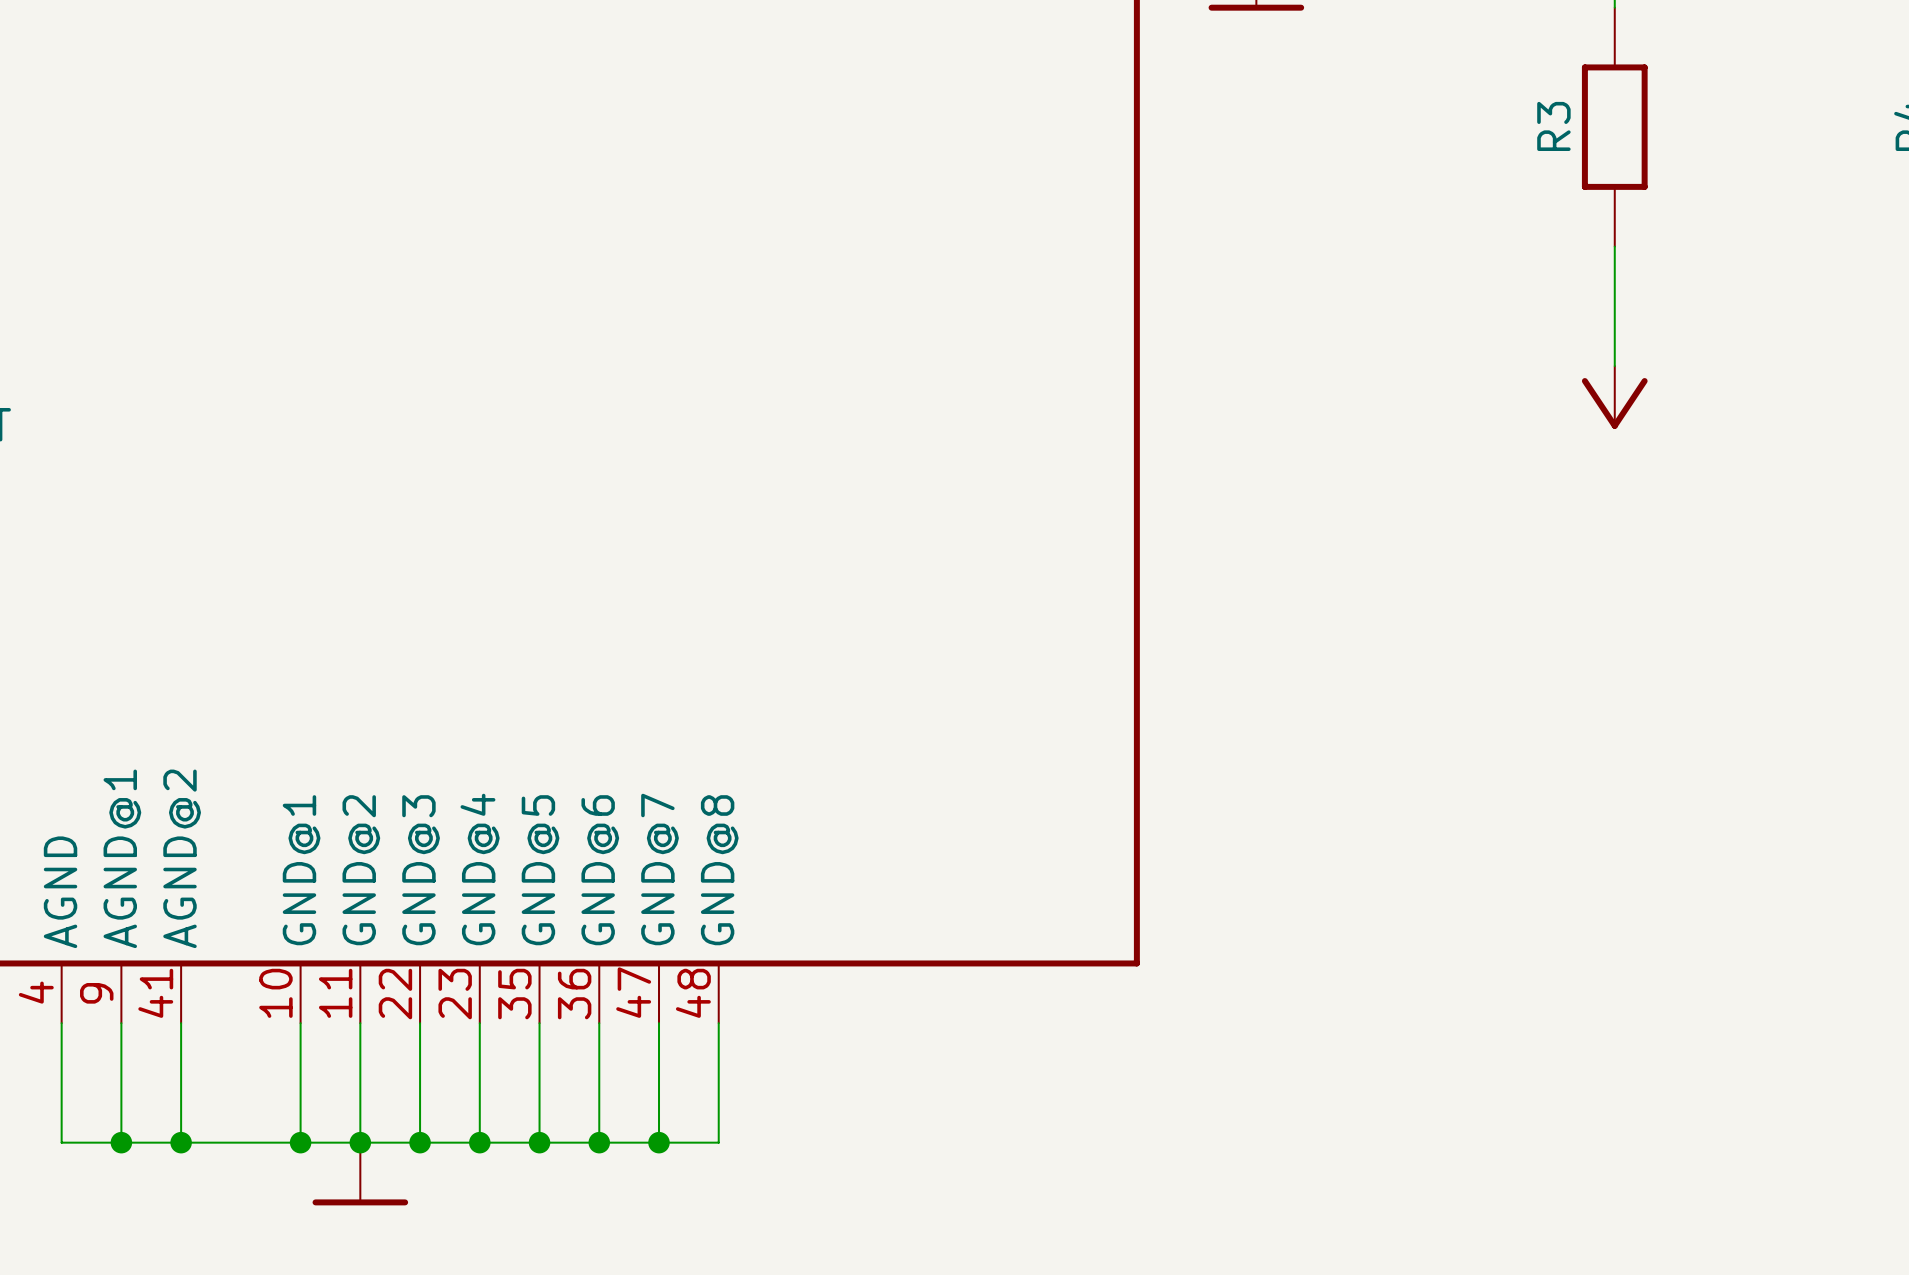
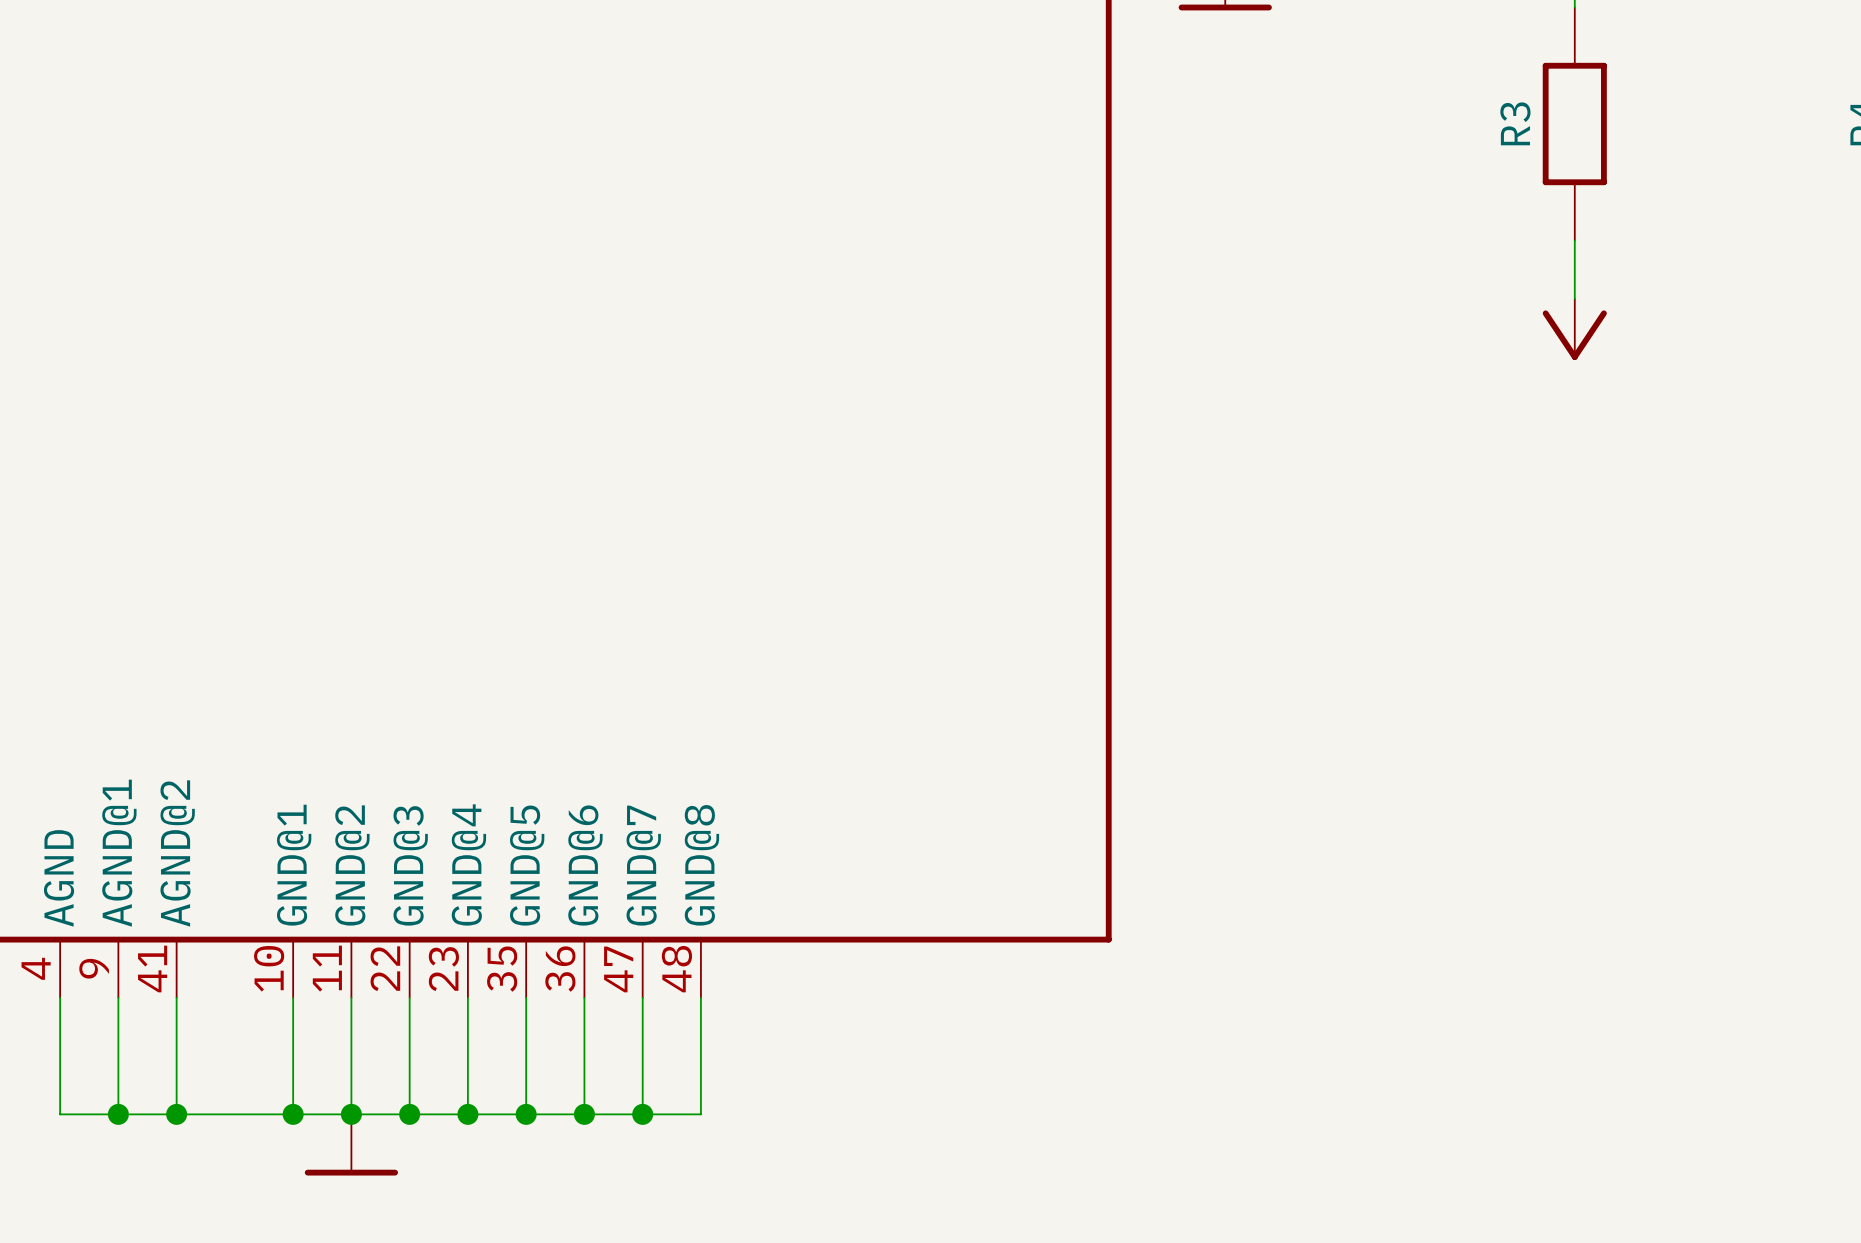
power symbol position: (1614, 397) -> (1574, 329)

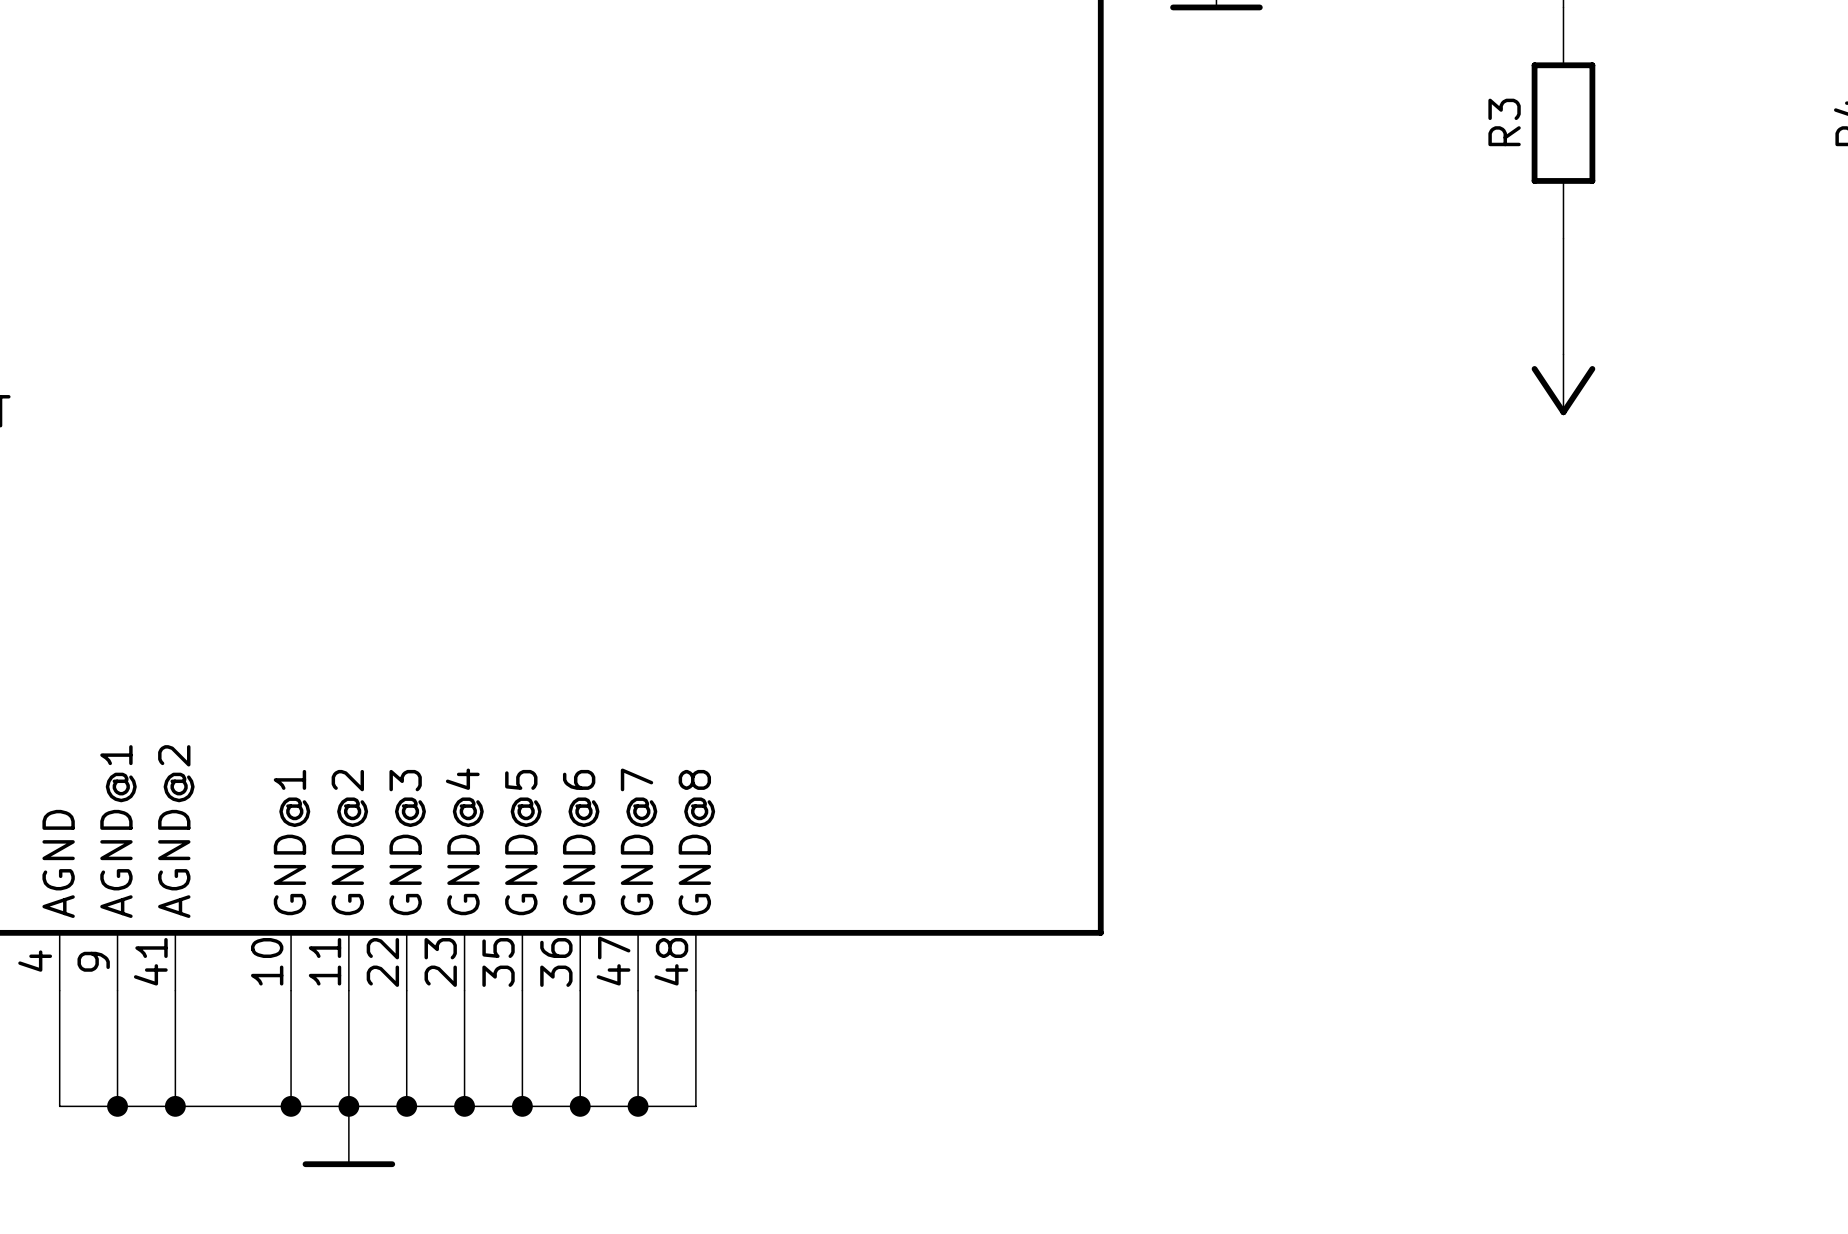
power symbol position: (1574, 329) -> (1563, 384)

